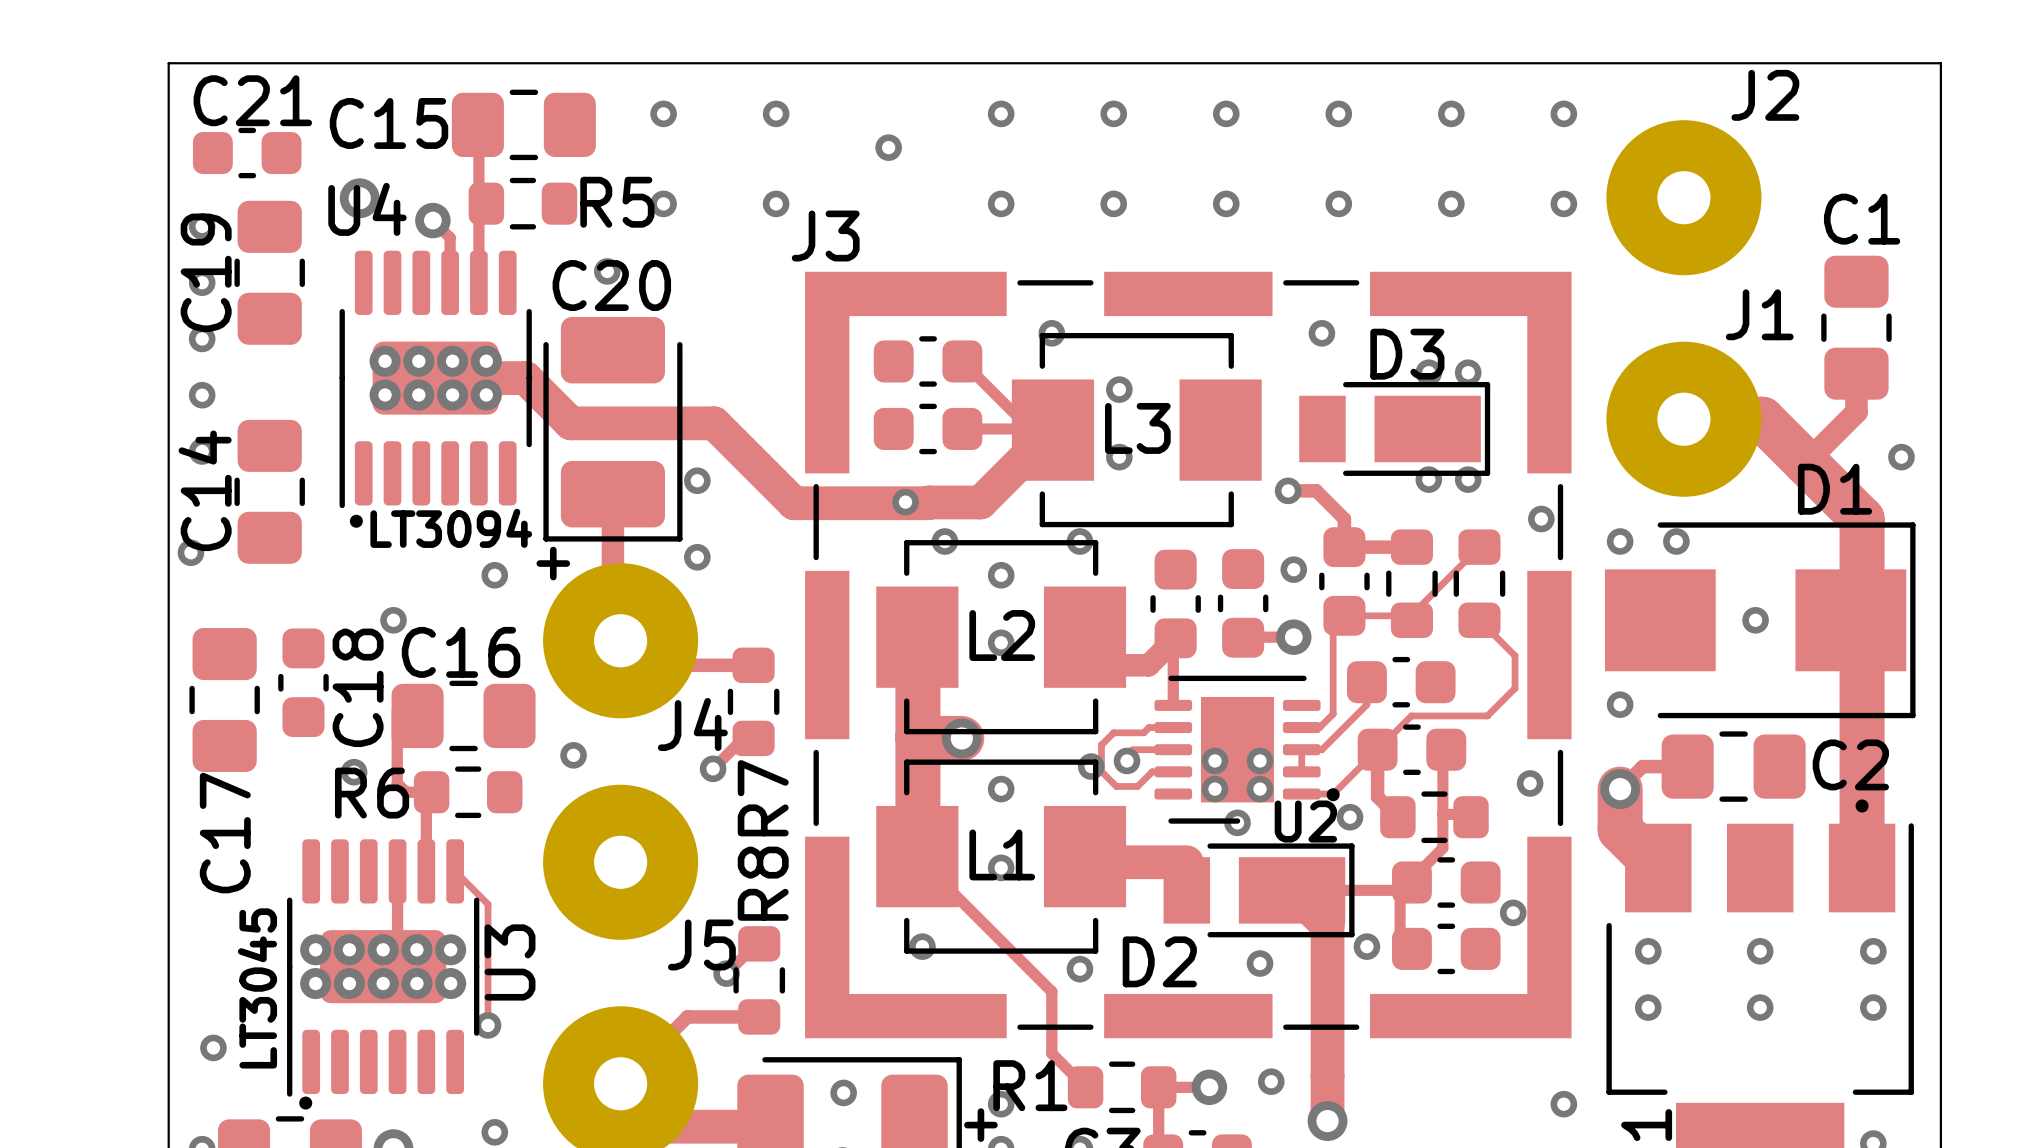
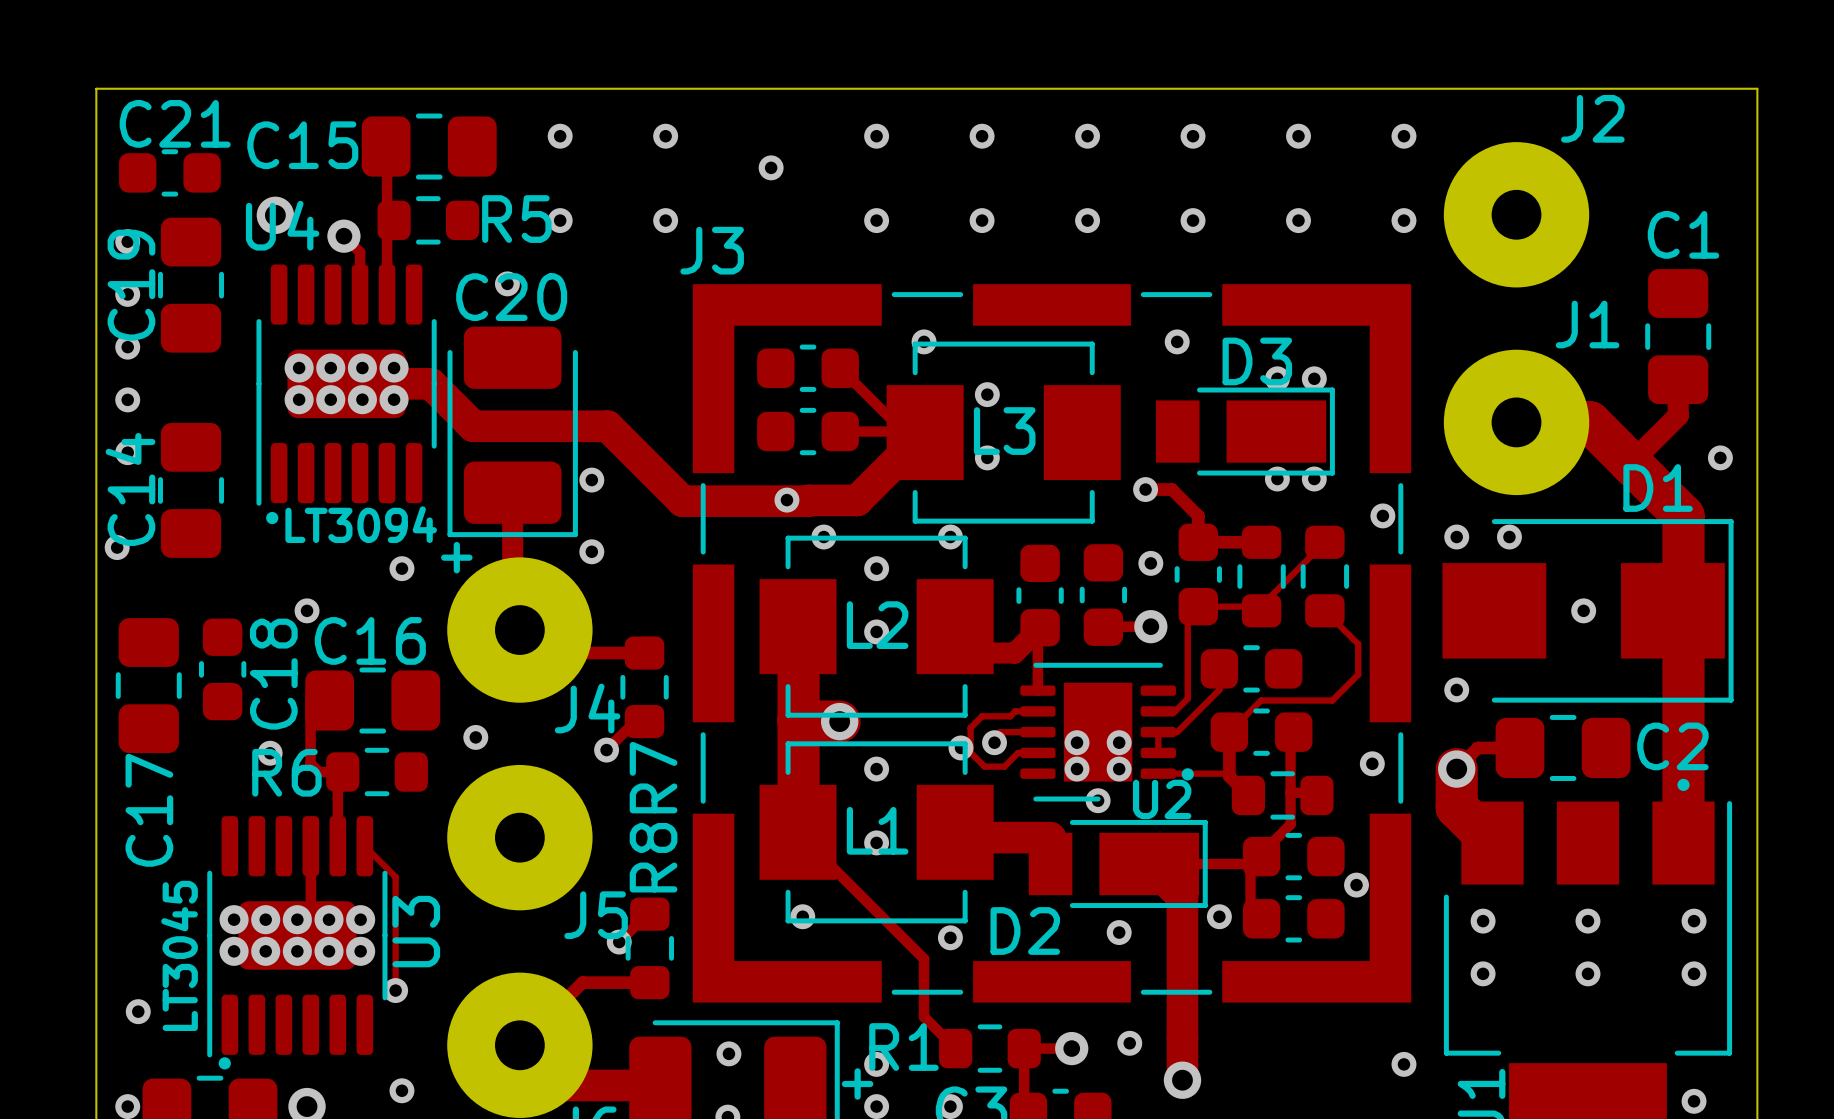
track: (1377, 749) (1333, 794) -> (1229, 776) (1226, 773) (1187, 773)
via: (1350, 817) -> none

